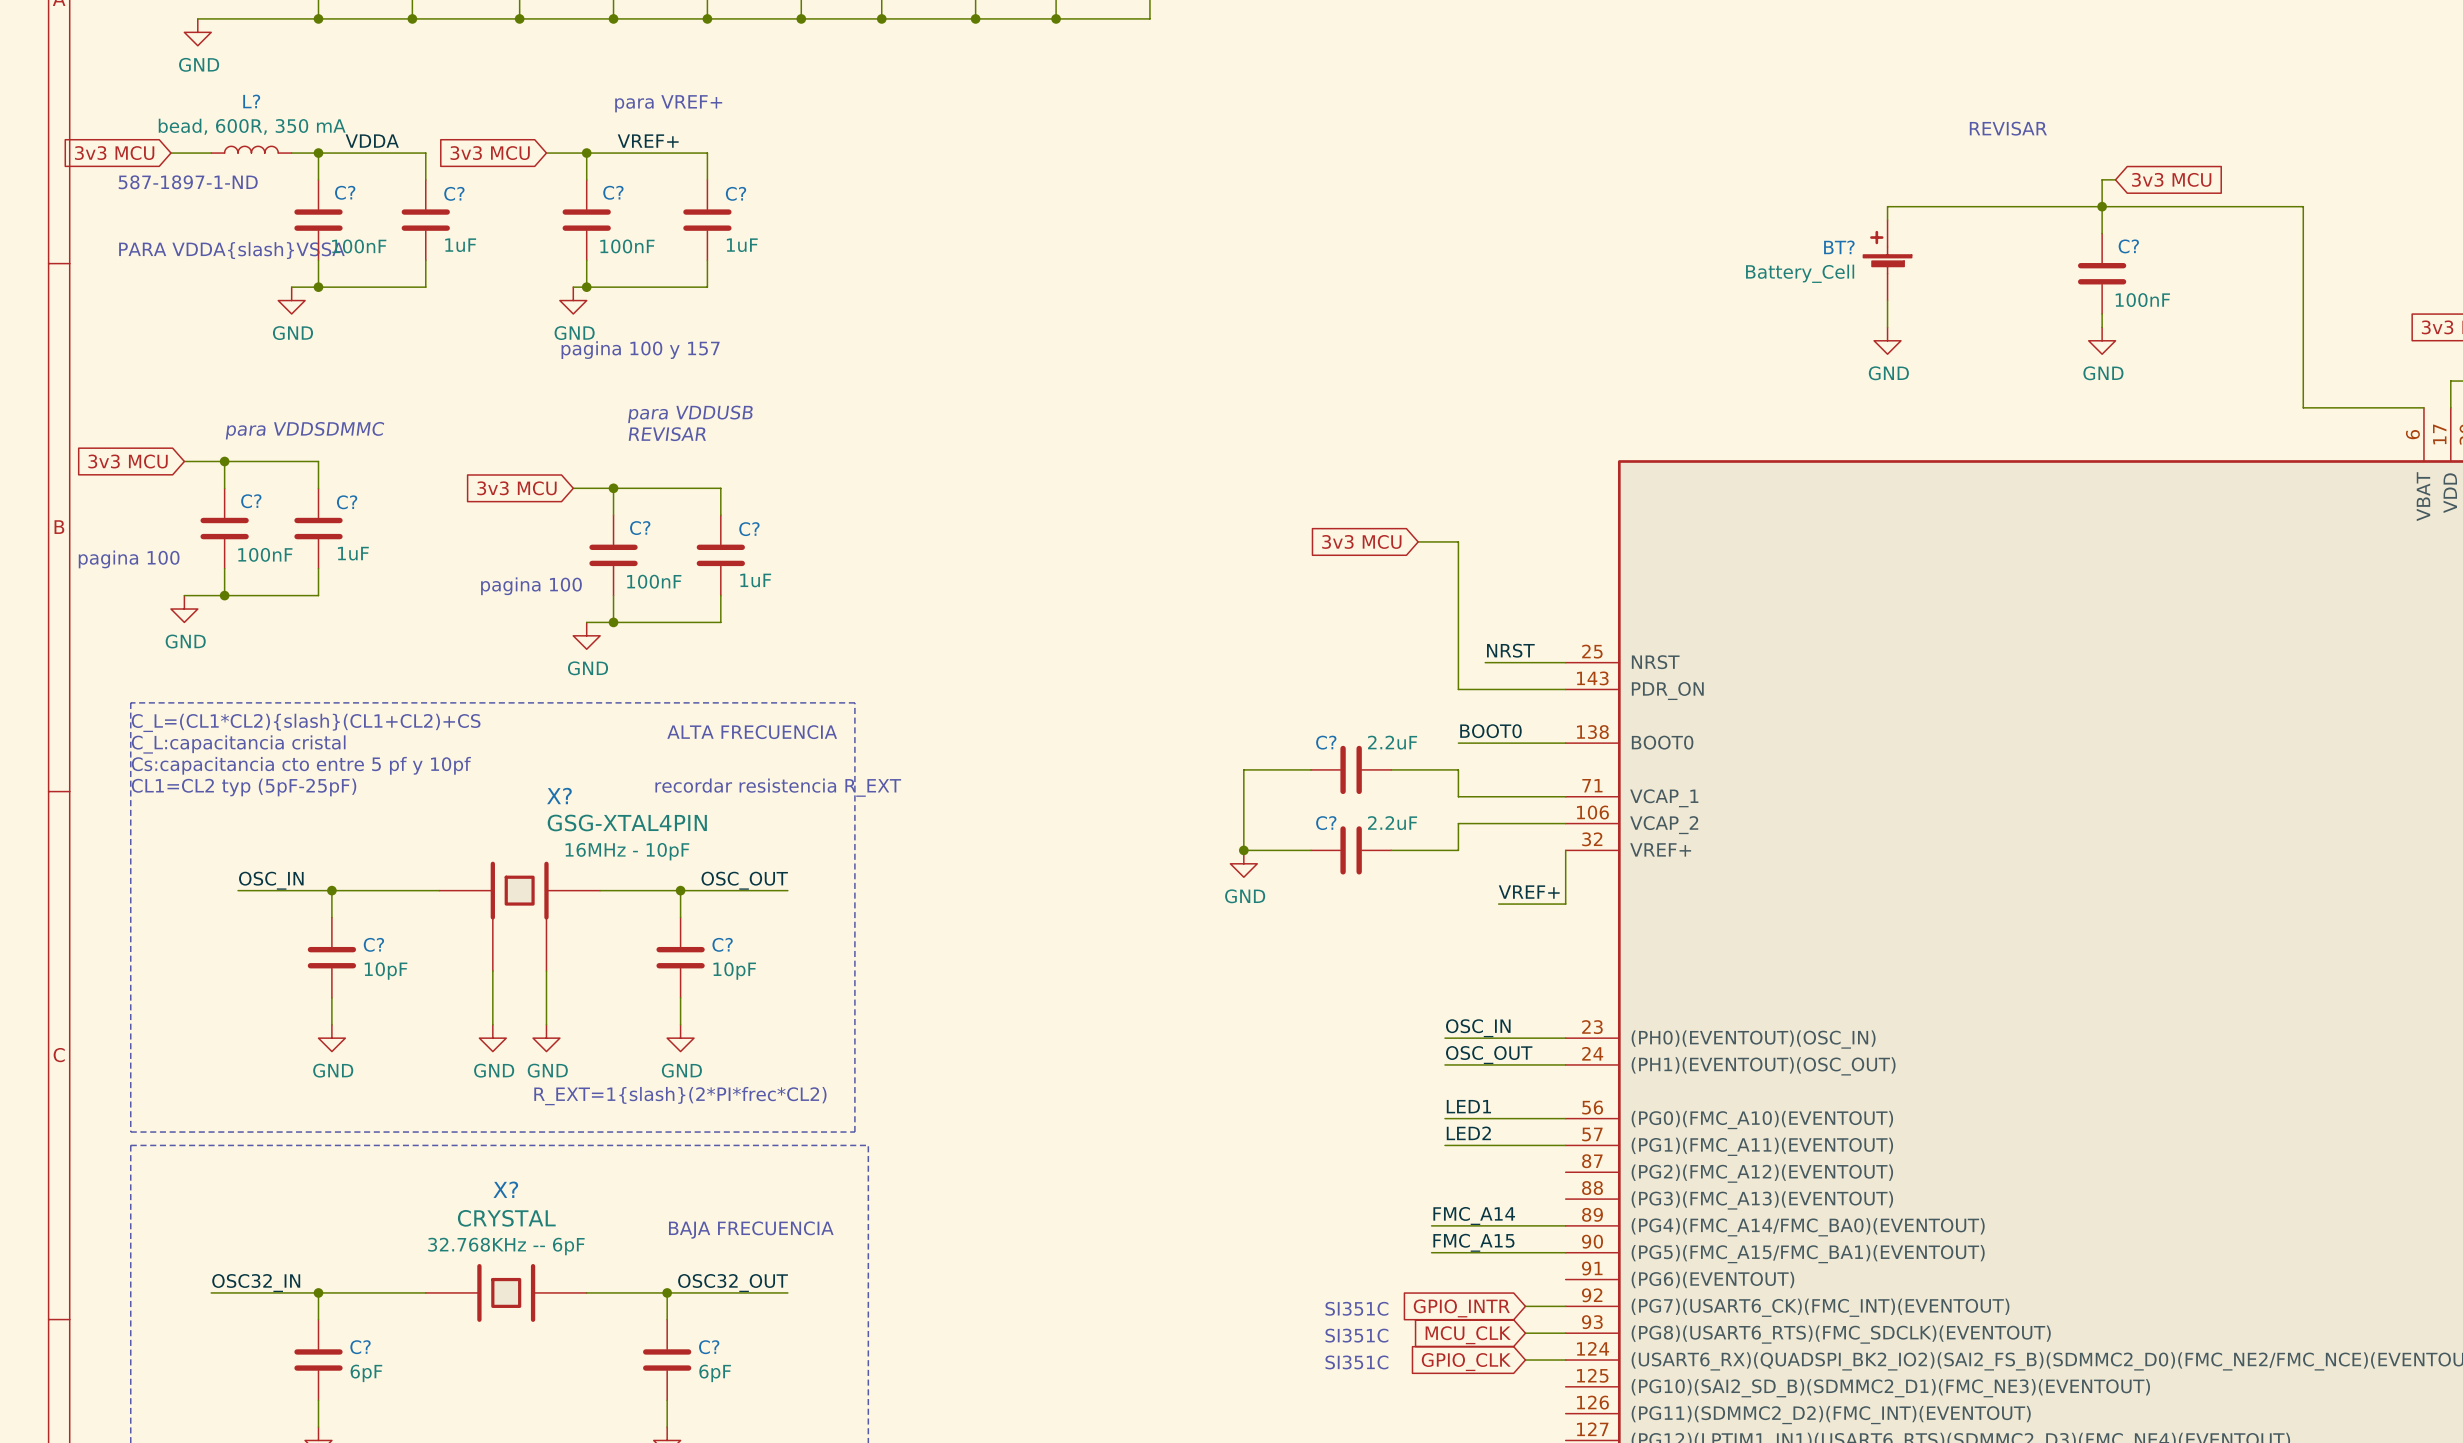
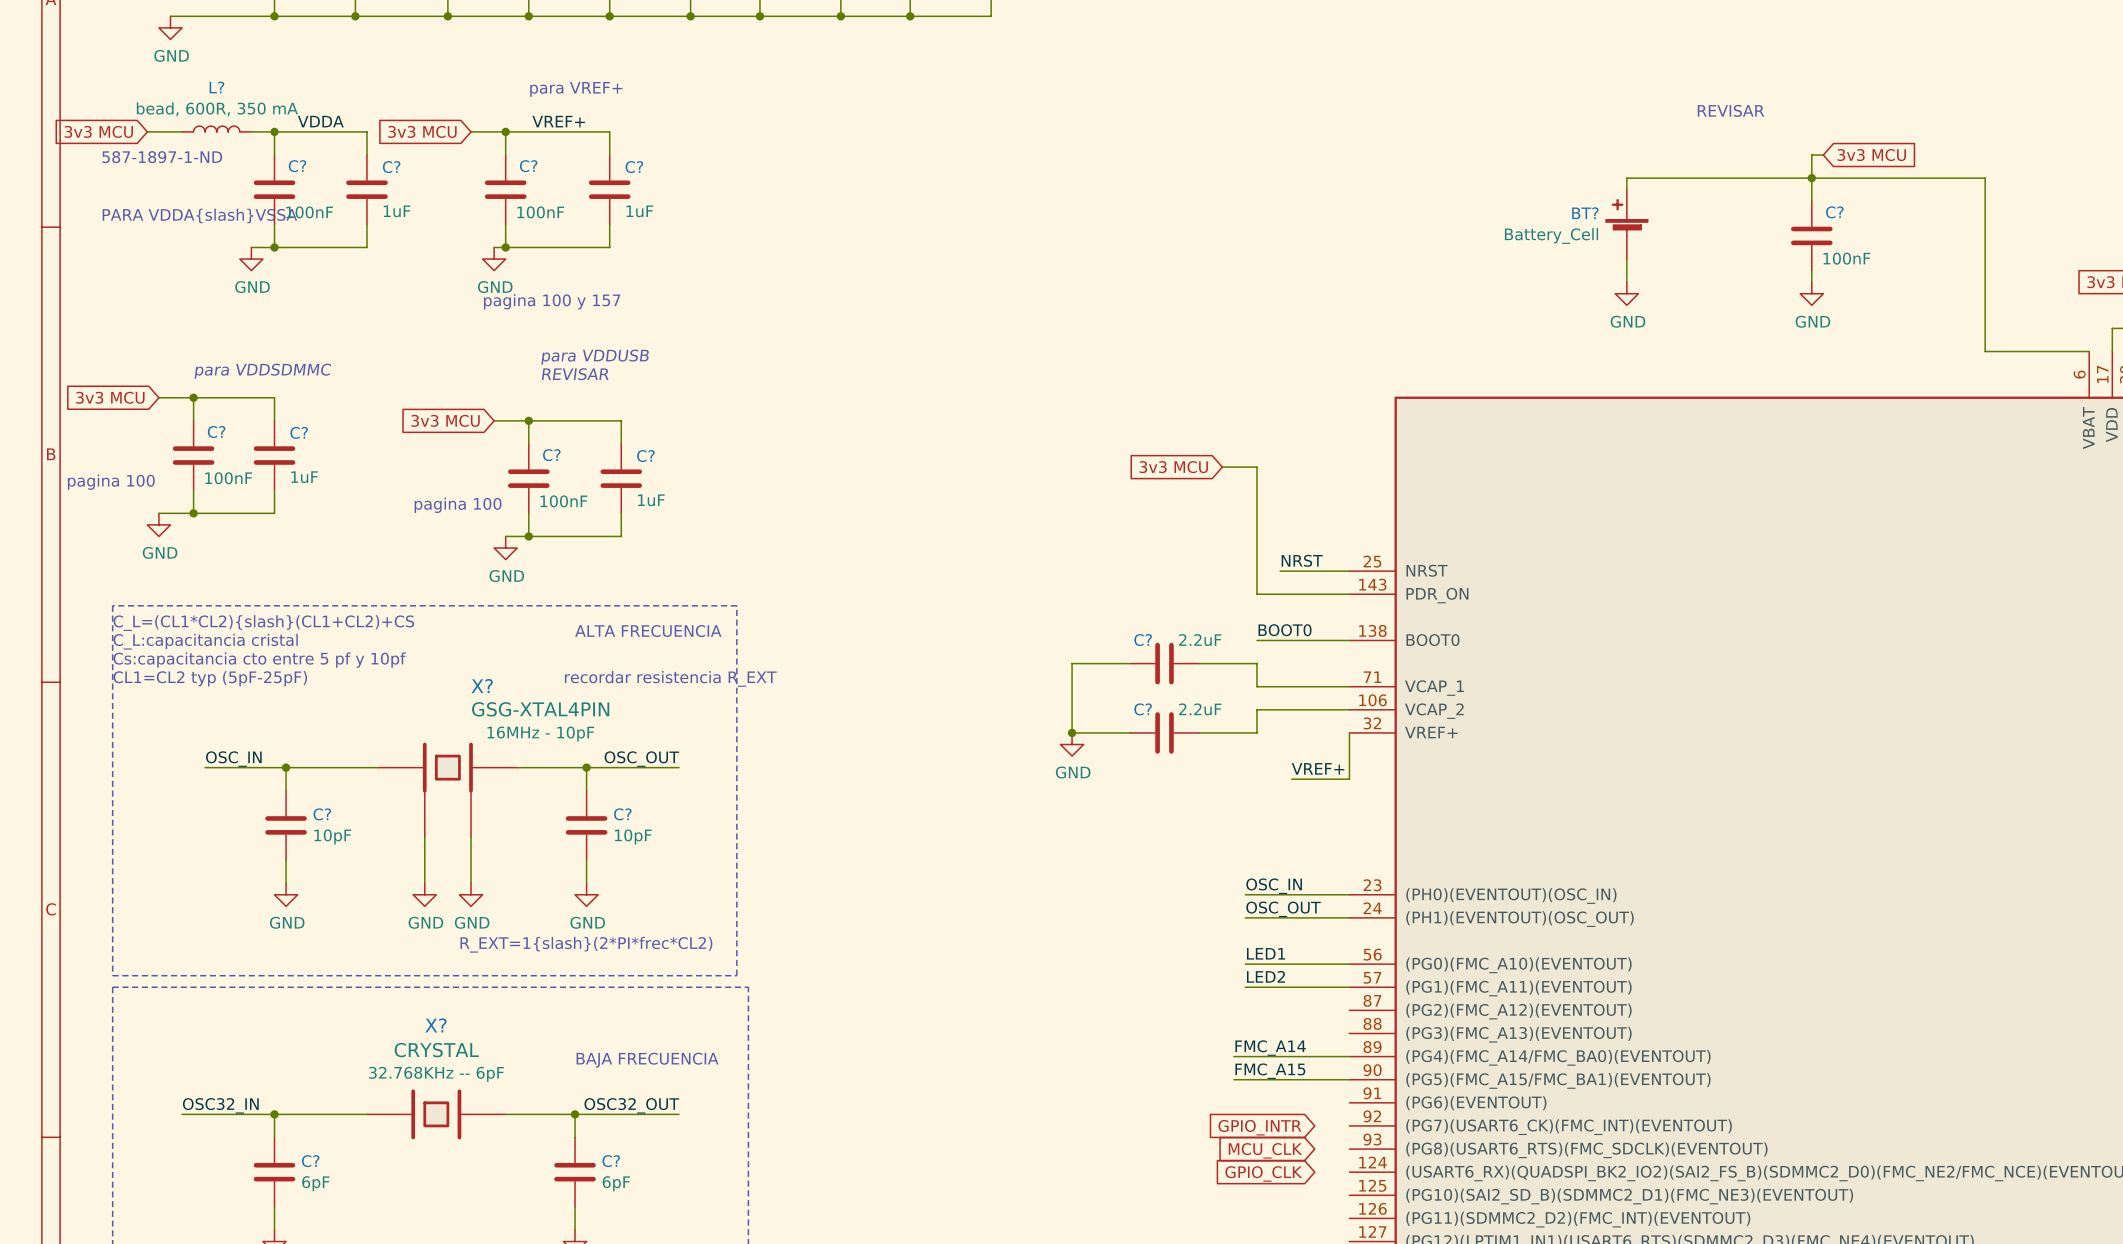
wire: (1525, 1306) (1565, 1306) -> none
text: SI351C (1356, 1308) -> none
wire: (1525, 1333) (1565, 1333) -> none
text: SI351C (1356, 1335) -> none
wire: (1525, 1360) (1565, 1360) -> none
text: SI351C (1356, 1362) -> none

